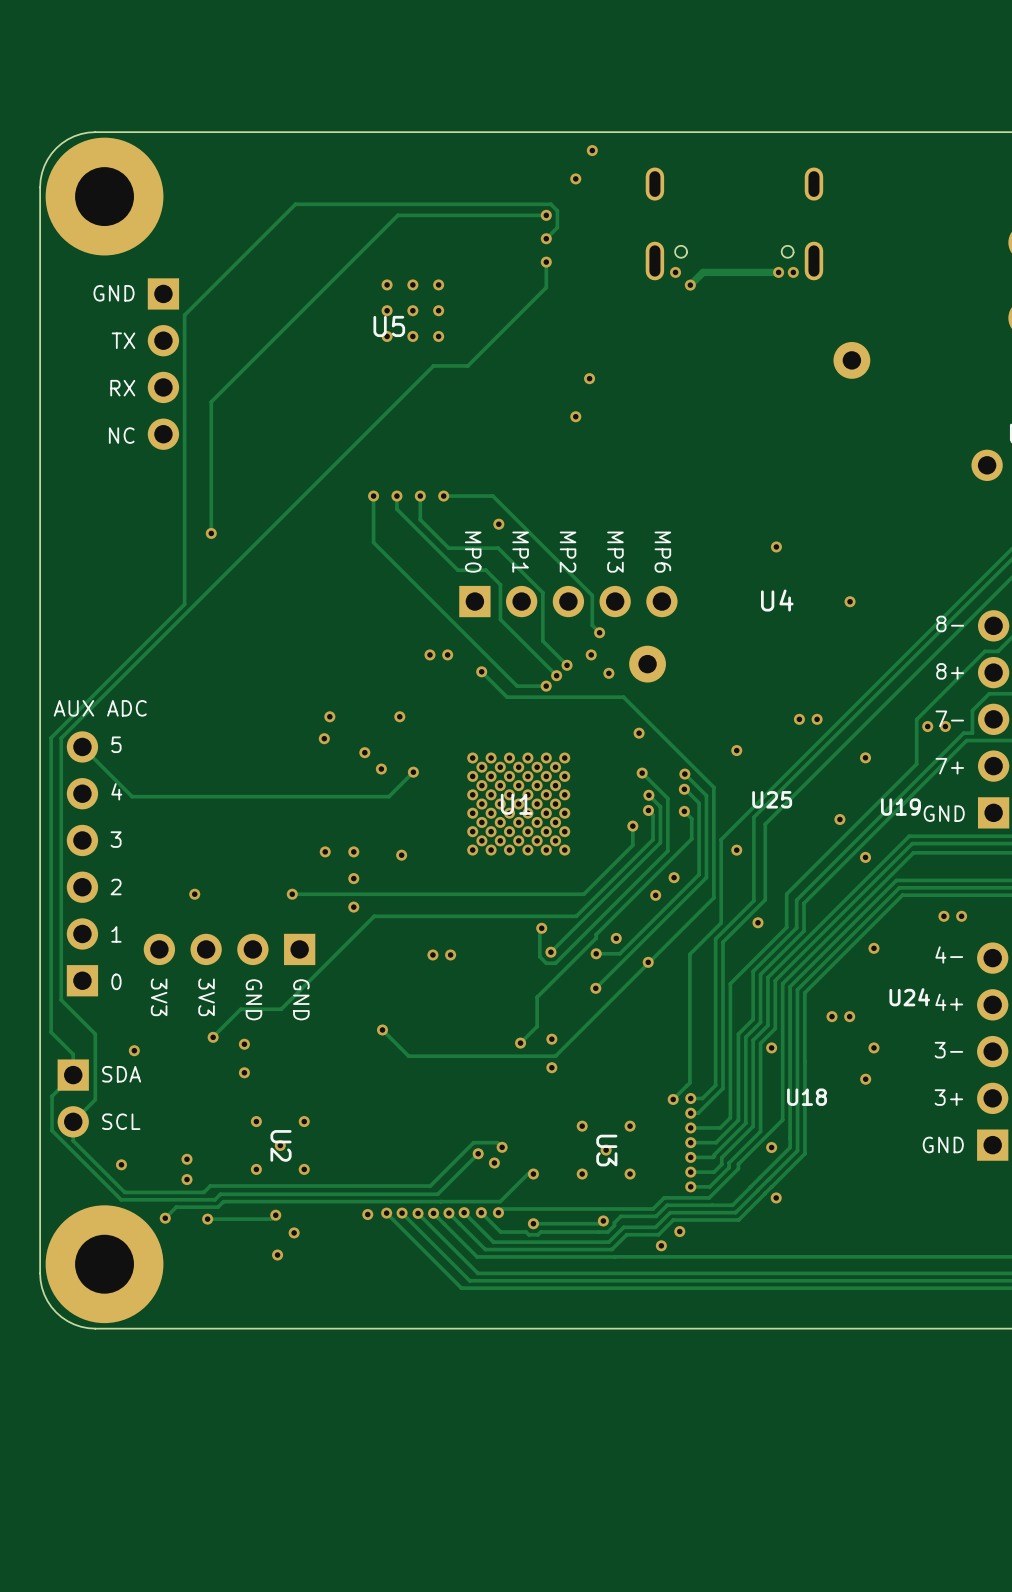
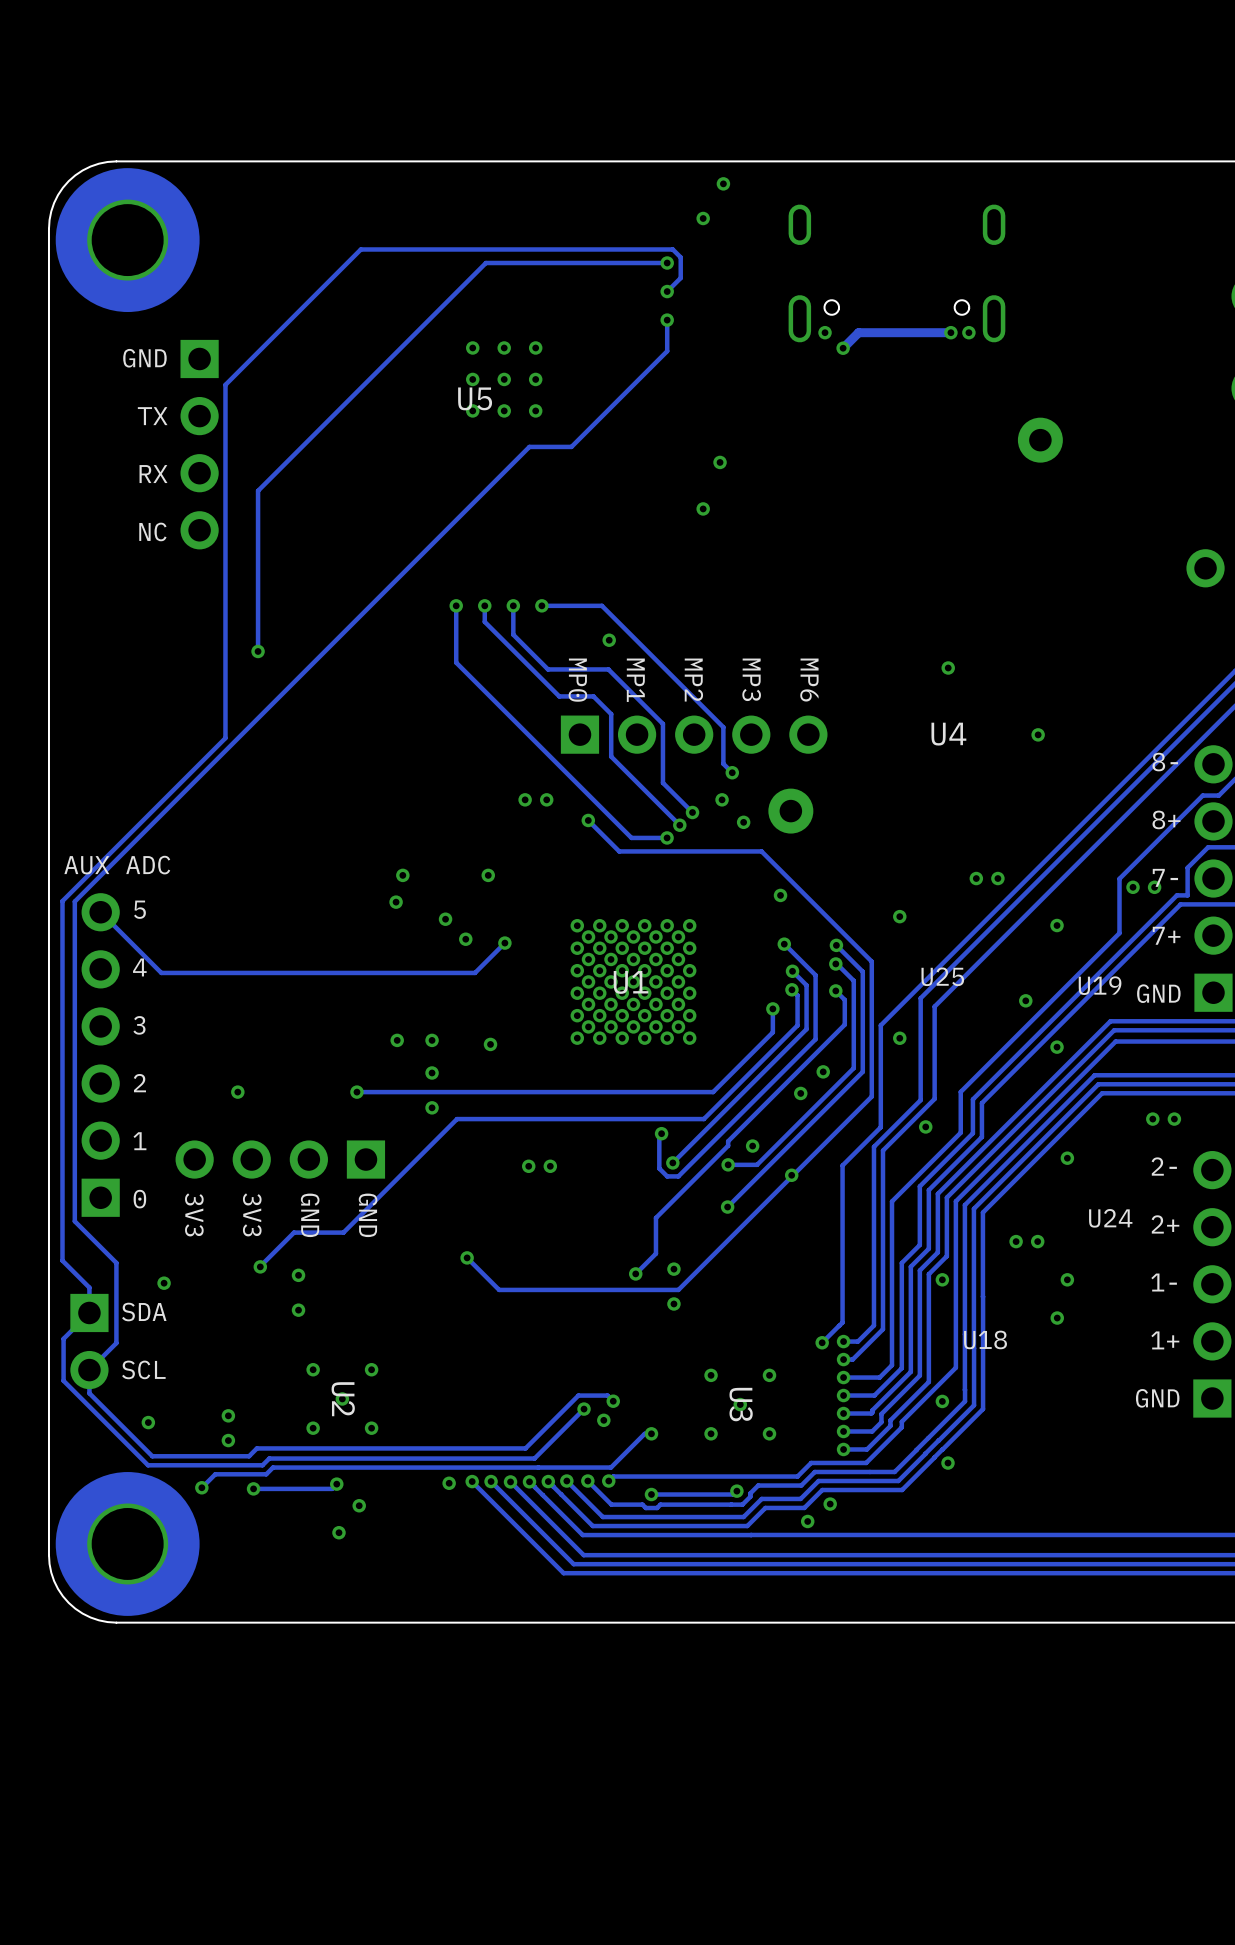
text: 4- (949, 954) -> 2- (1164, 1166)
text: 4+ (949, 1002) -> 2+ (1165, 1224)
text: 3- (948, 1050) -> 1- (1164, 1282)
text: 3+ (948, 1097) -> 1+ (1165, 1340)

